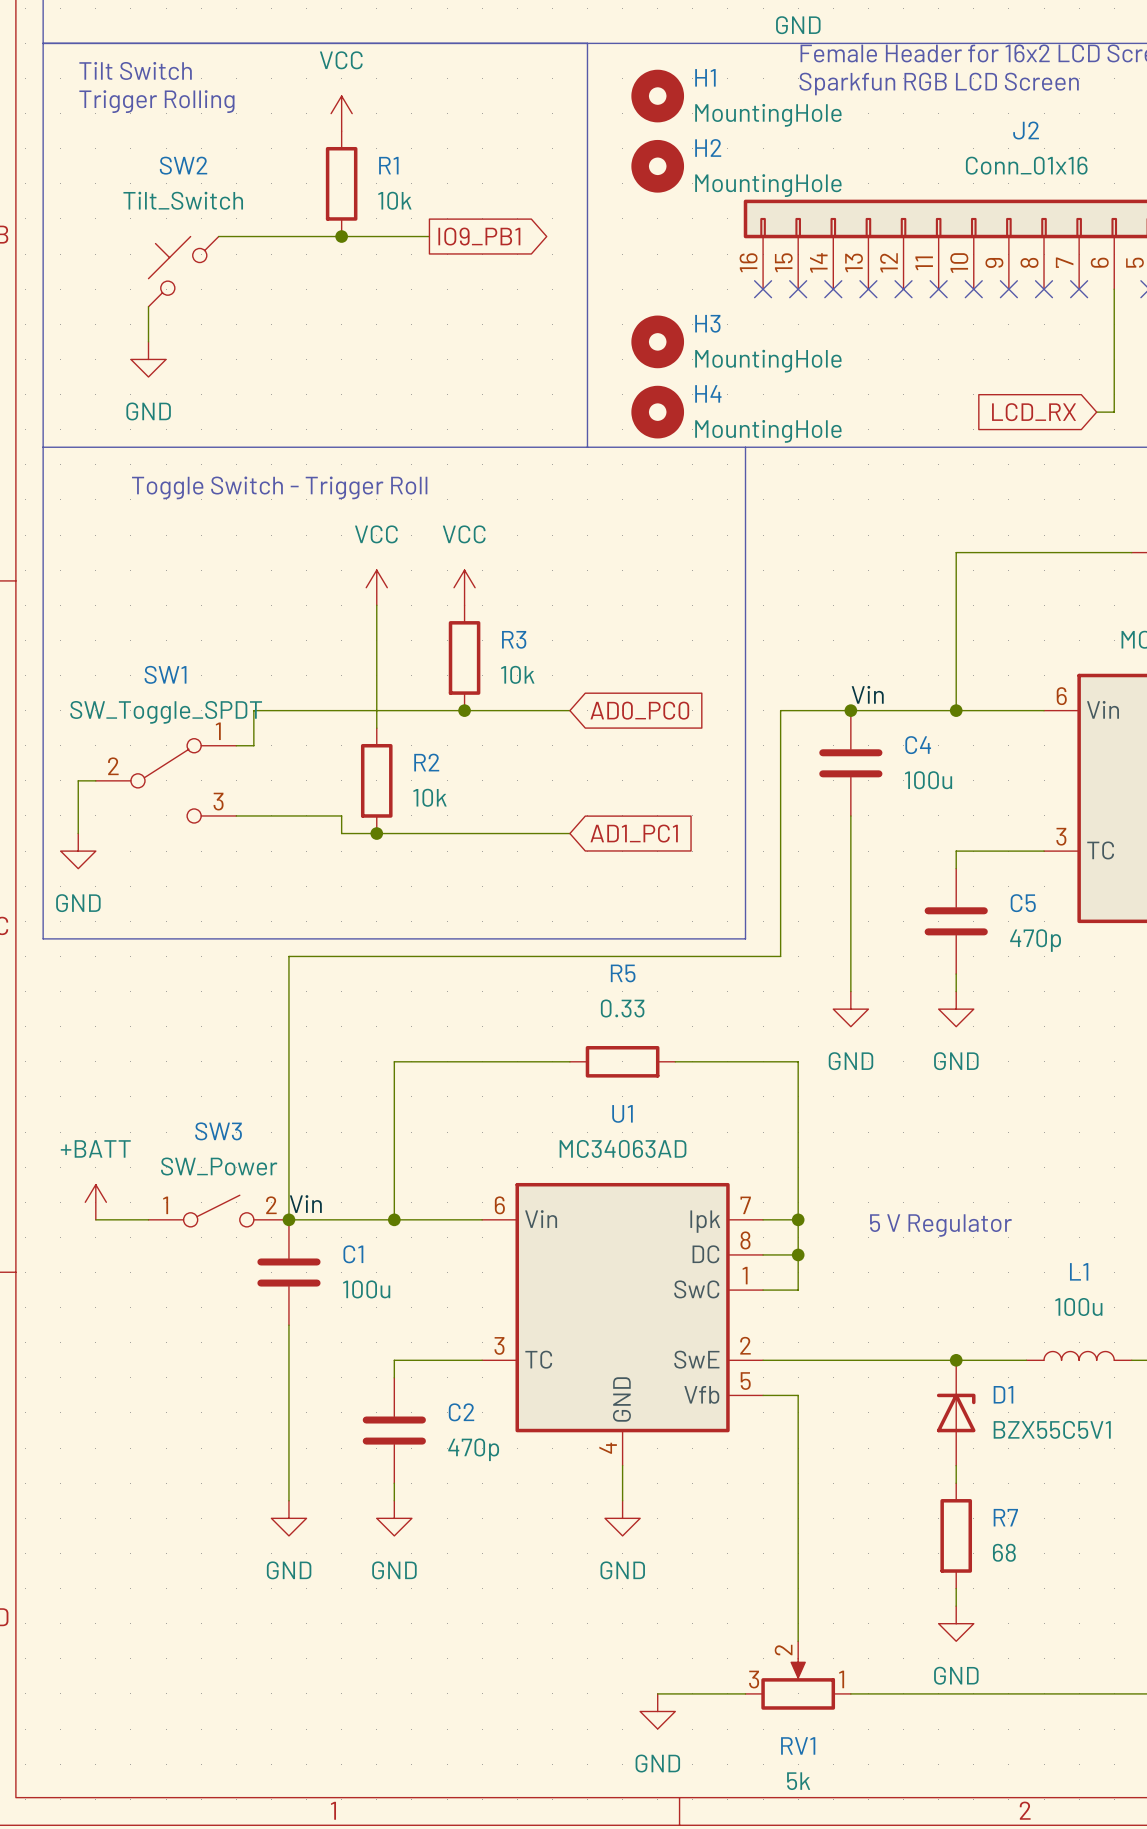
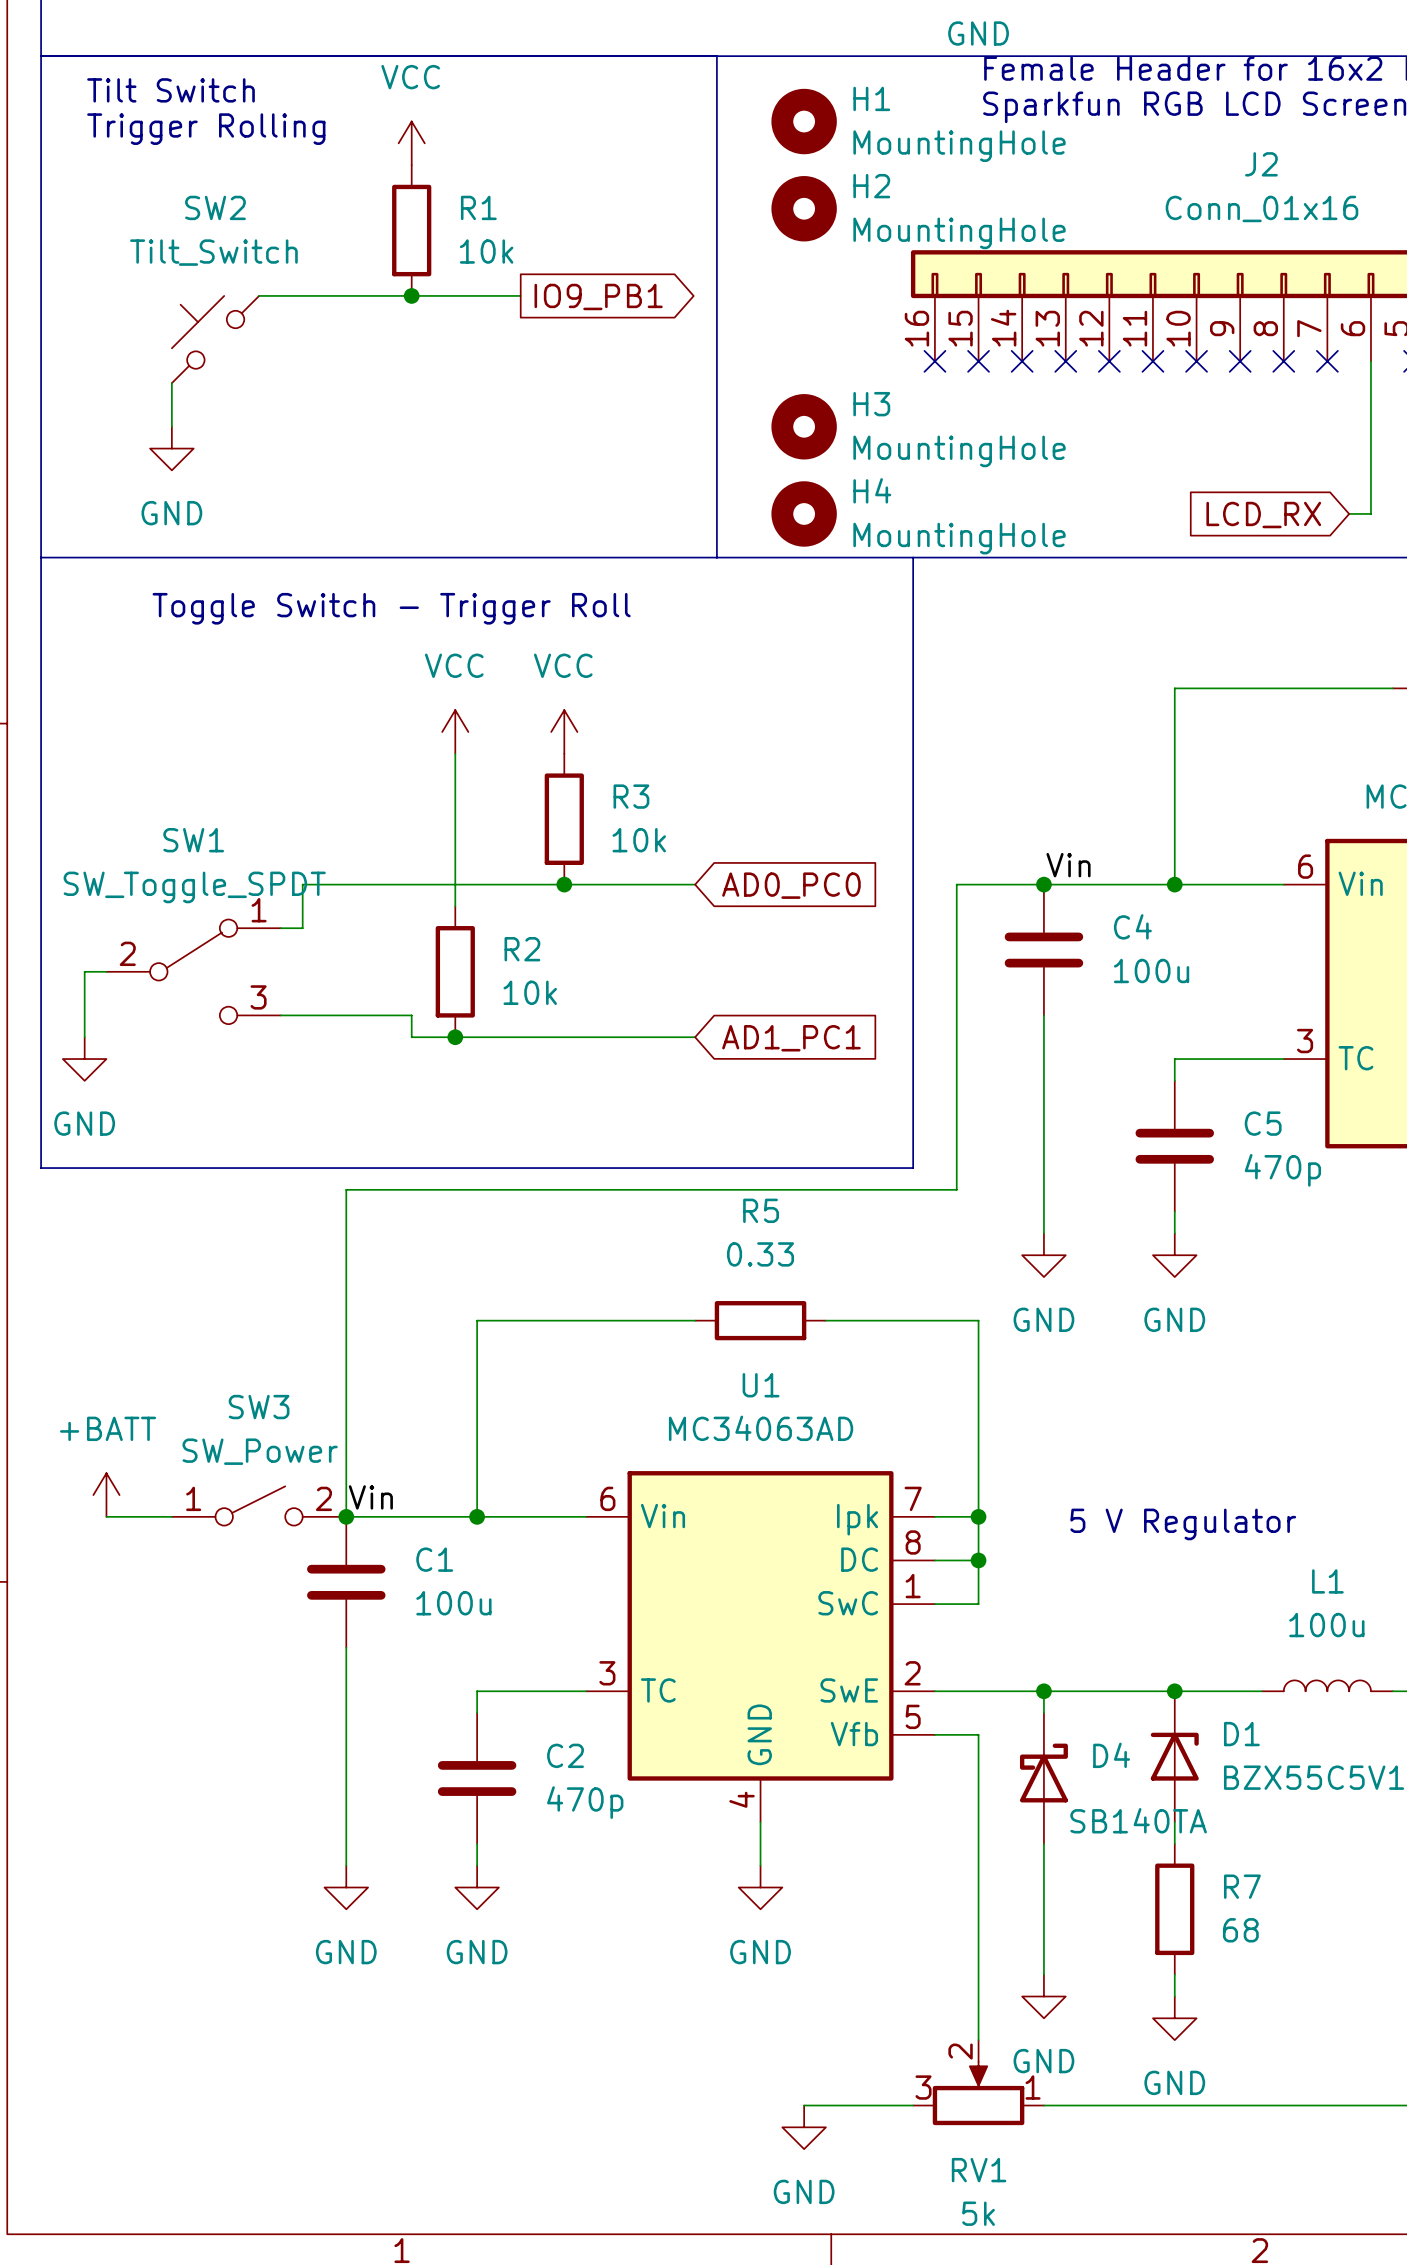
wire: none -> (1043, 1691) (1043, 1713)
junction: none -> (1043, 1691)
D4: none -> SB140TA (1043, 1778)
wire: none -> (1043, 1843) (1043, 1974)
power symbol: none -> GND (1043, 1996)

